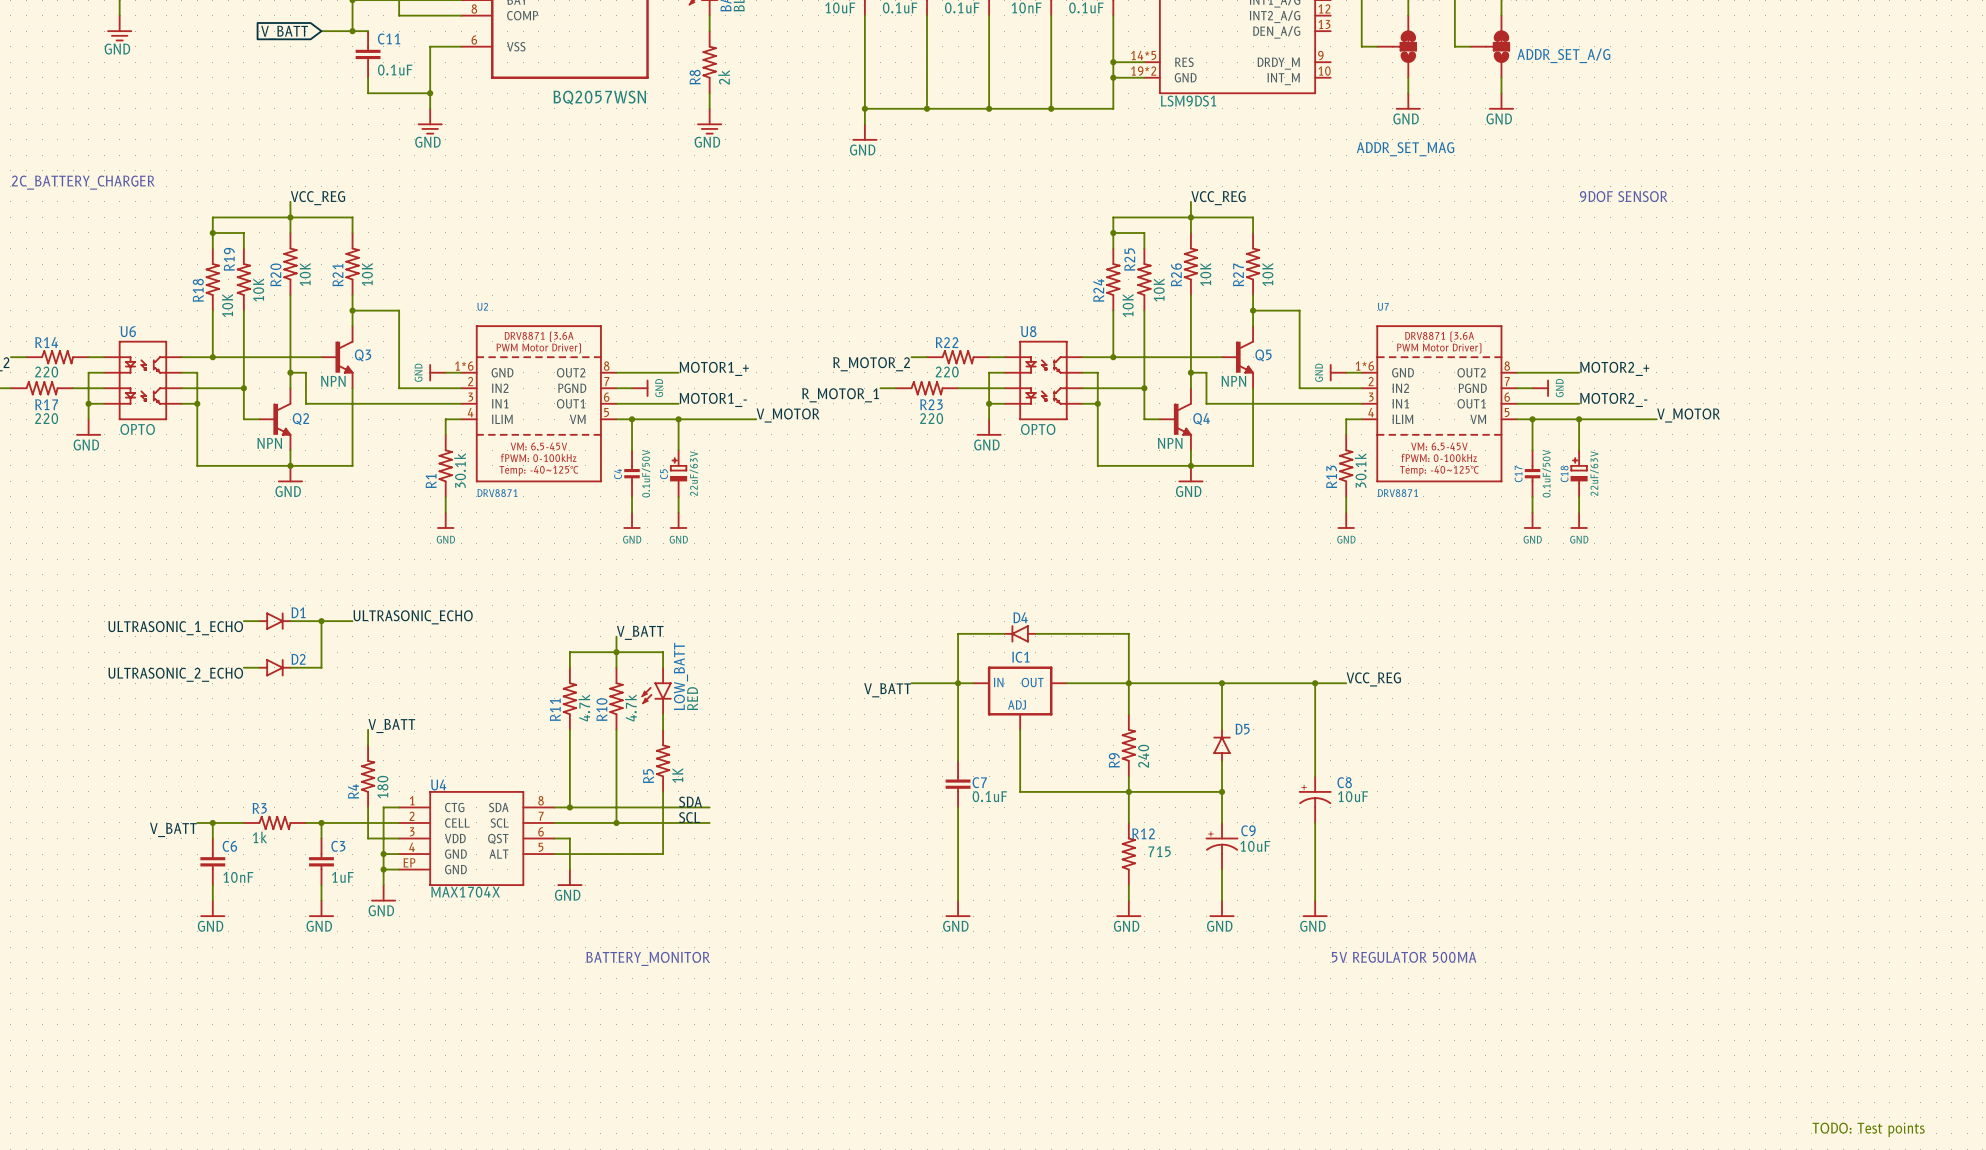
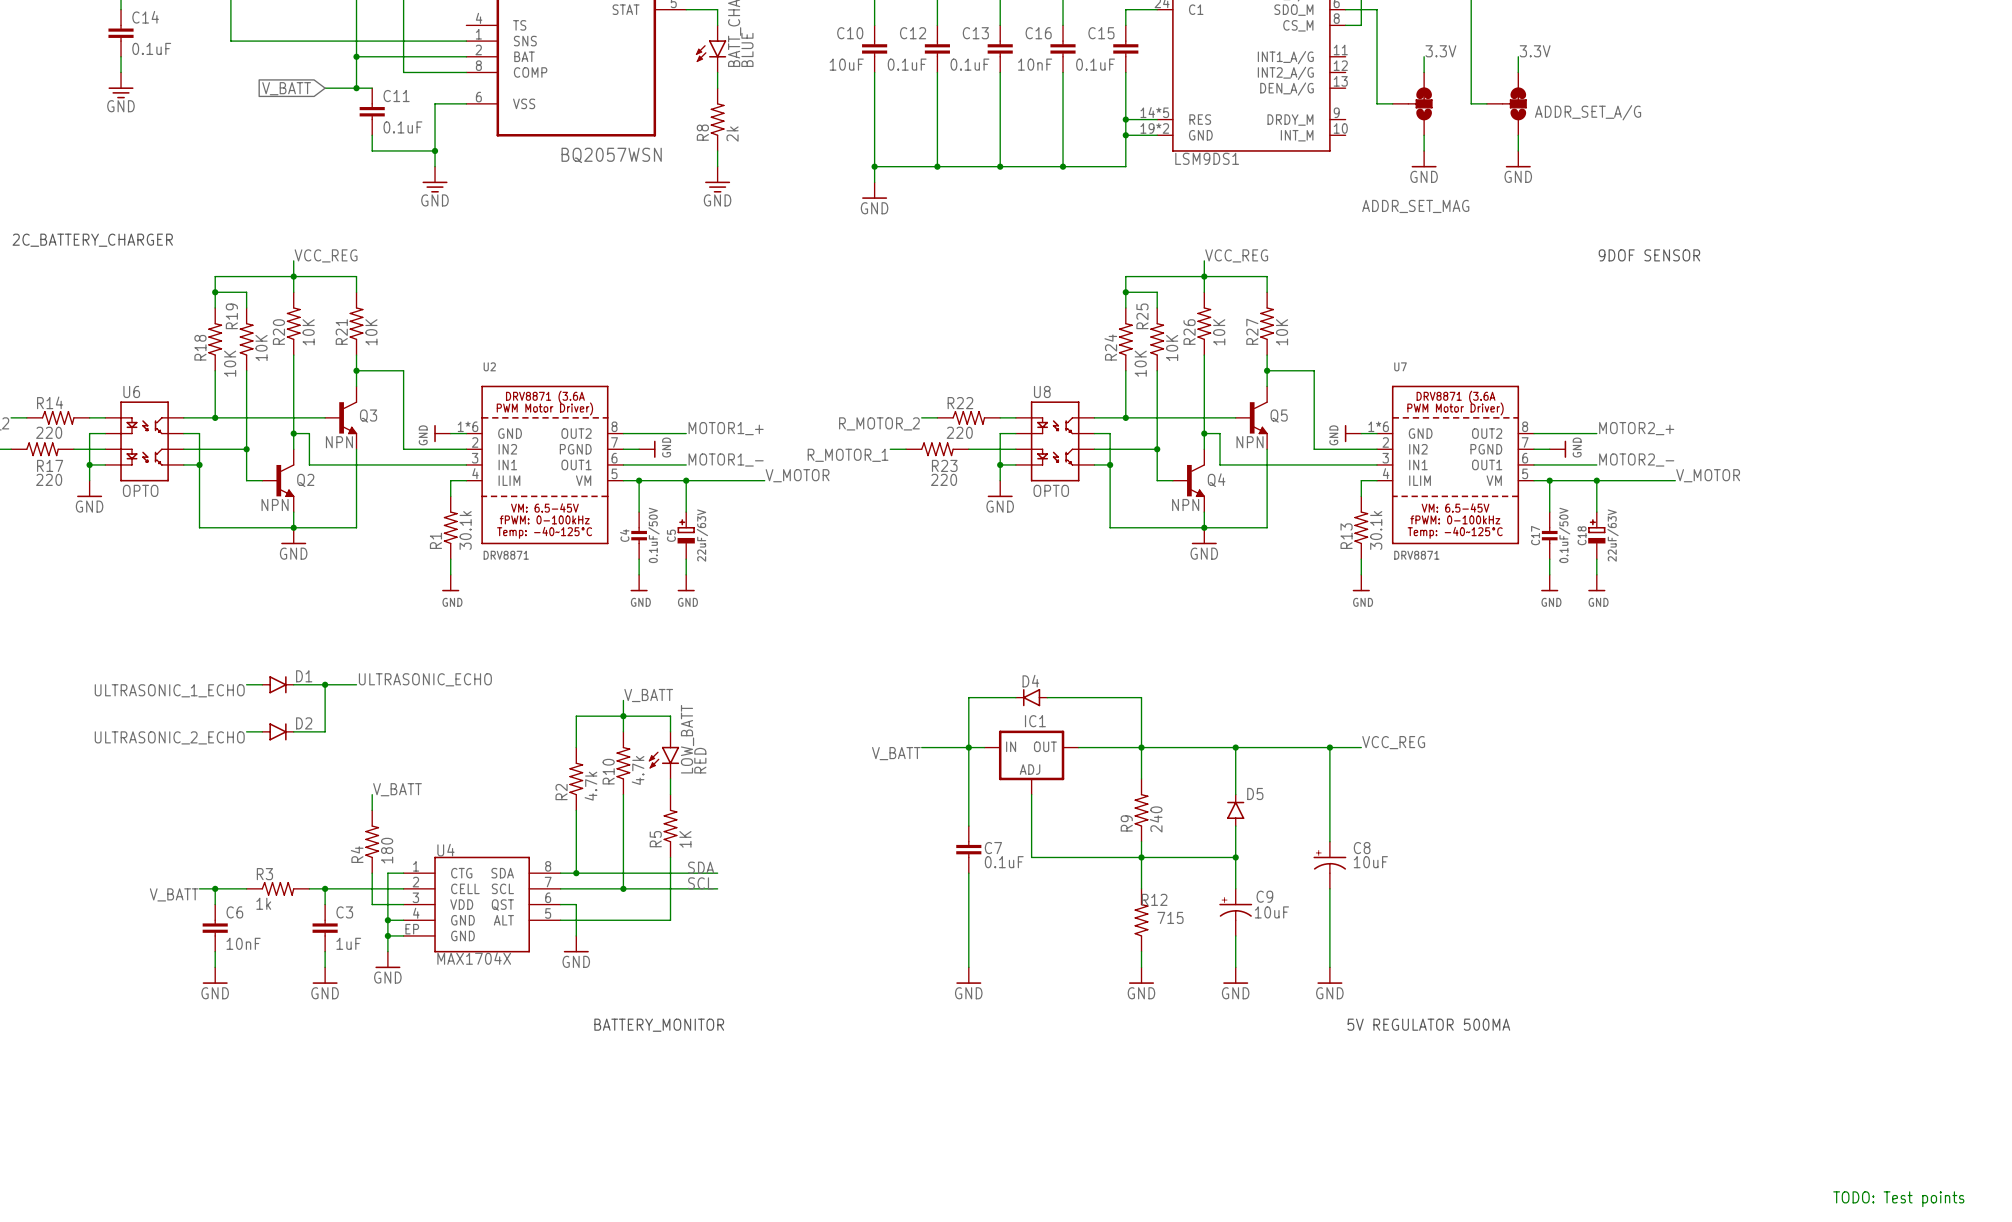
R11: 4.7k (569, 698) -> none
R2: none -> 4.7k (576, 778)

